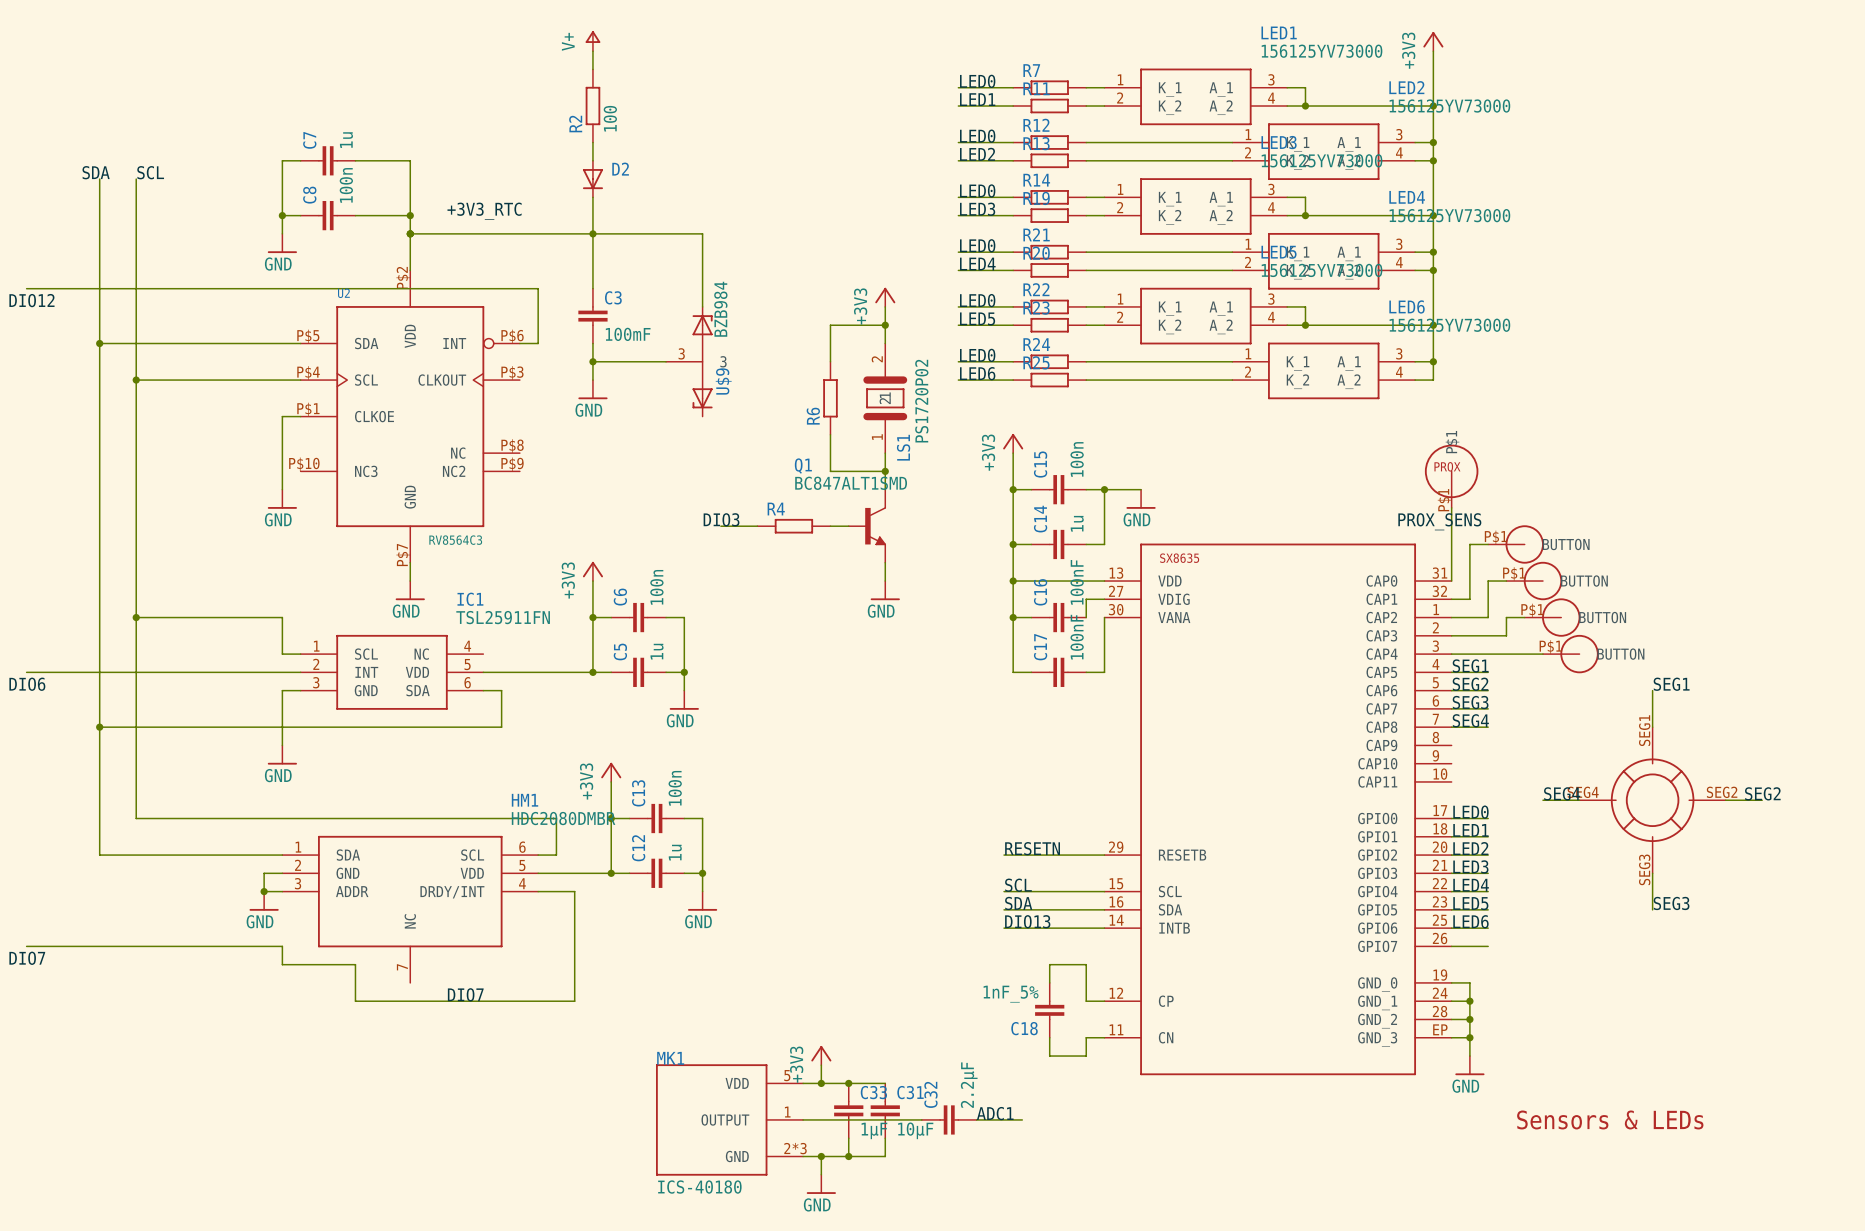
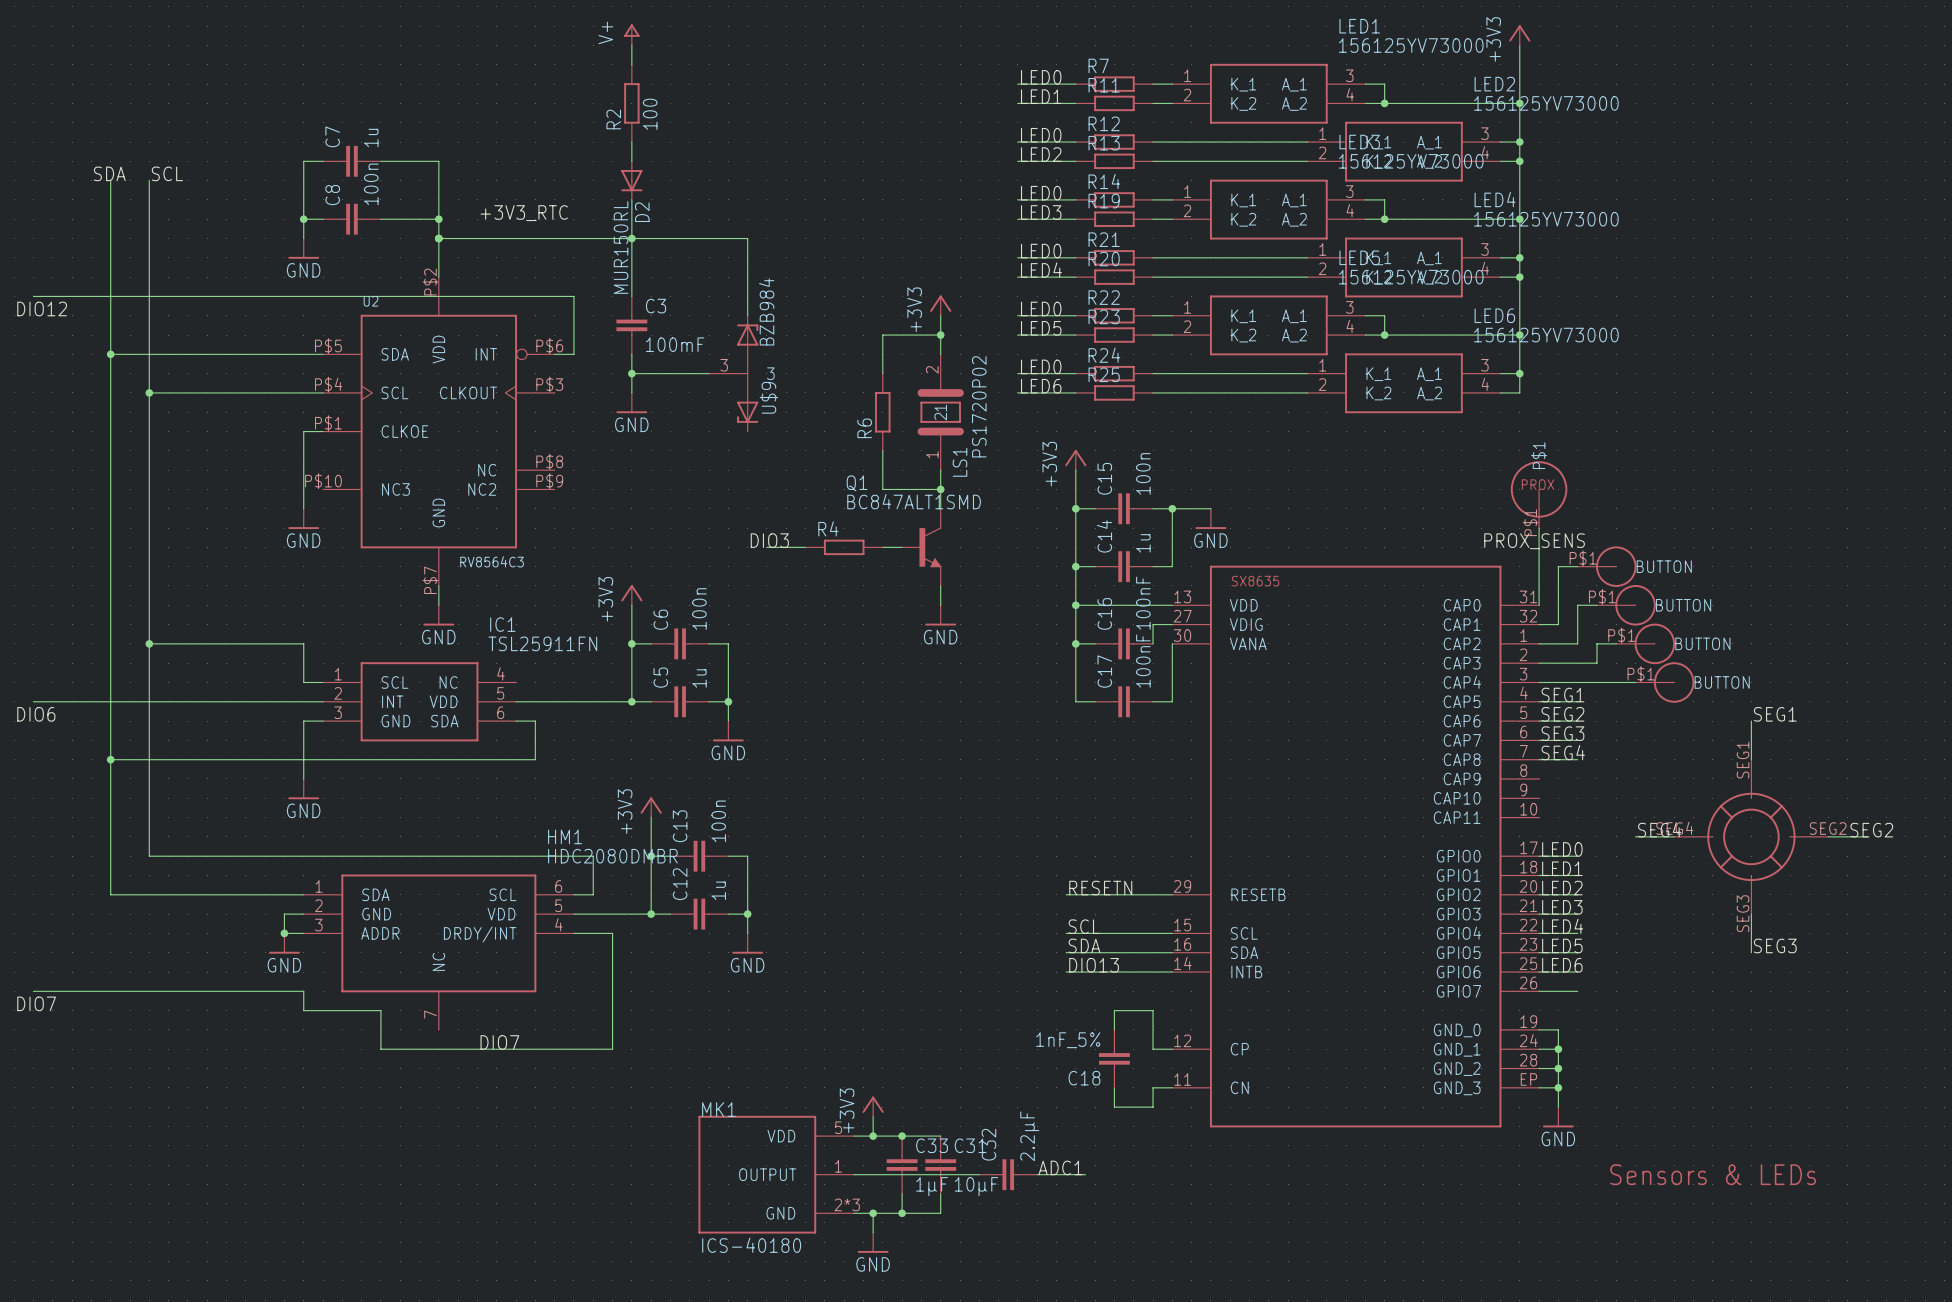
D2 name rotation: 0° (620, 169) -> 90° counterclockwise (642, 212)
D2 name position: D2 (620, 169) -> D2 (642, 212)
D2 value: none -> MUR150RL (621, 247)

